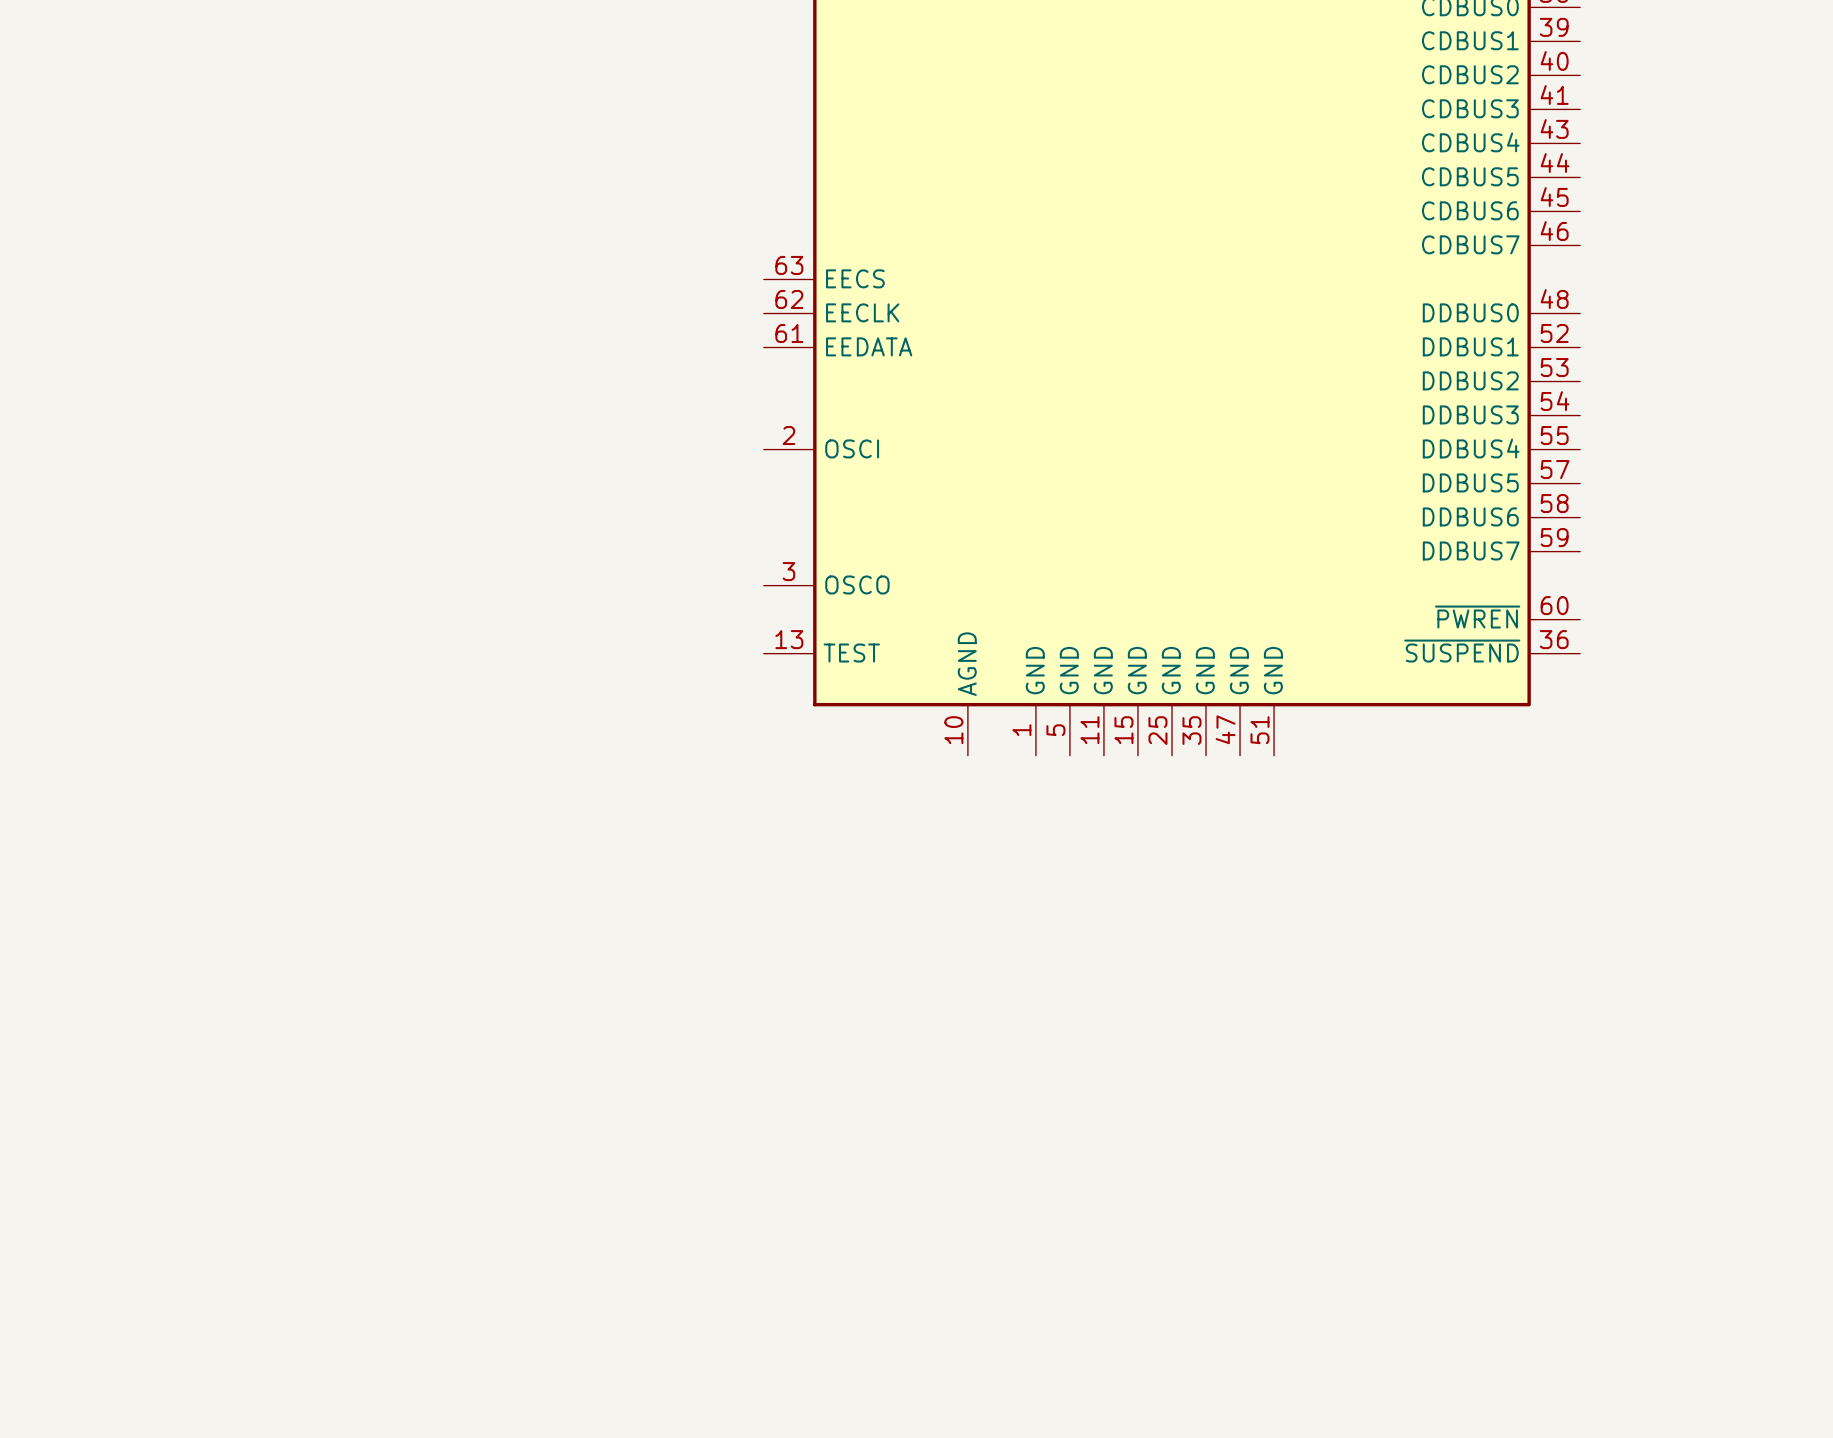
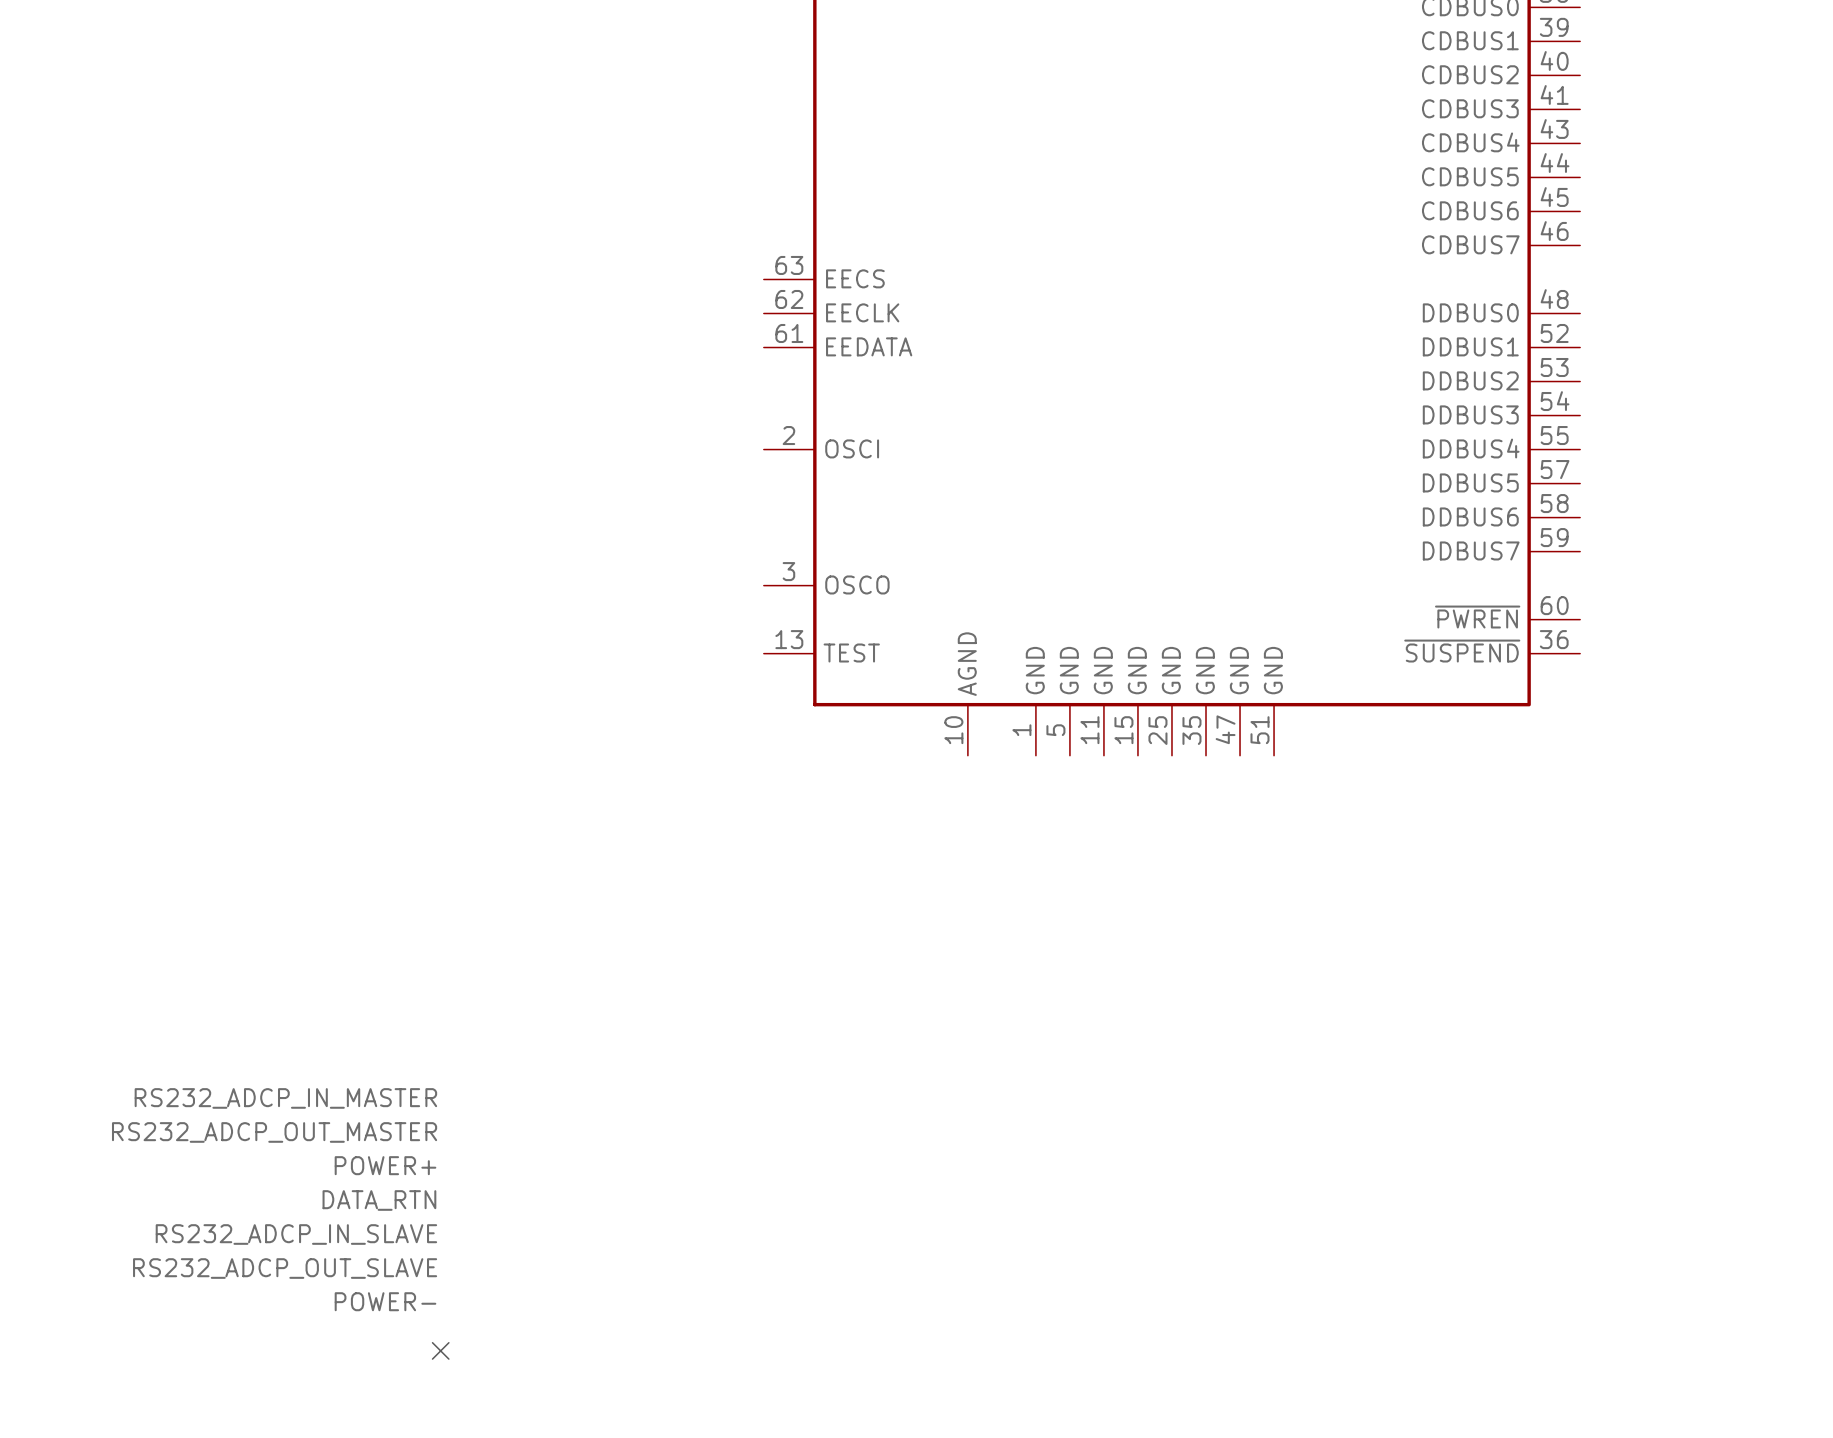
label: none -> RS232_ADCP_IN_MASTER (285, 1098)
label: none -> RS232_ADCP_OUT_MASTER (274, 1132)
label: none -> POWER+ (385, 1165)
label: none -> DATA_RTN (379, 1200)
label: none -> RS232_ADCP_IN_SLAVE (296, 1234)
label: none -> RS232_ADCP_OUT_SLAVE (285, 1268)
label: none -> POWER- (385, 1301)
no-connect mark: none -> (440, 1350)

